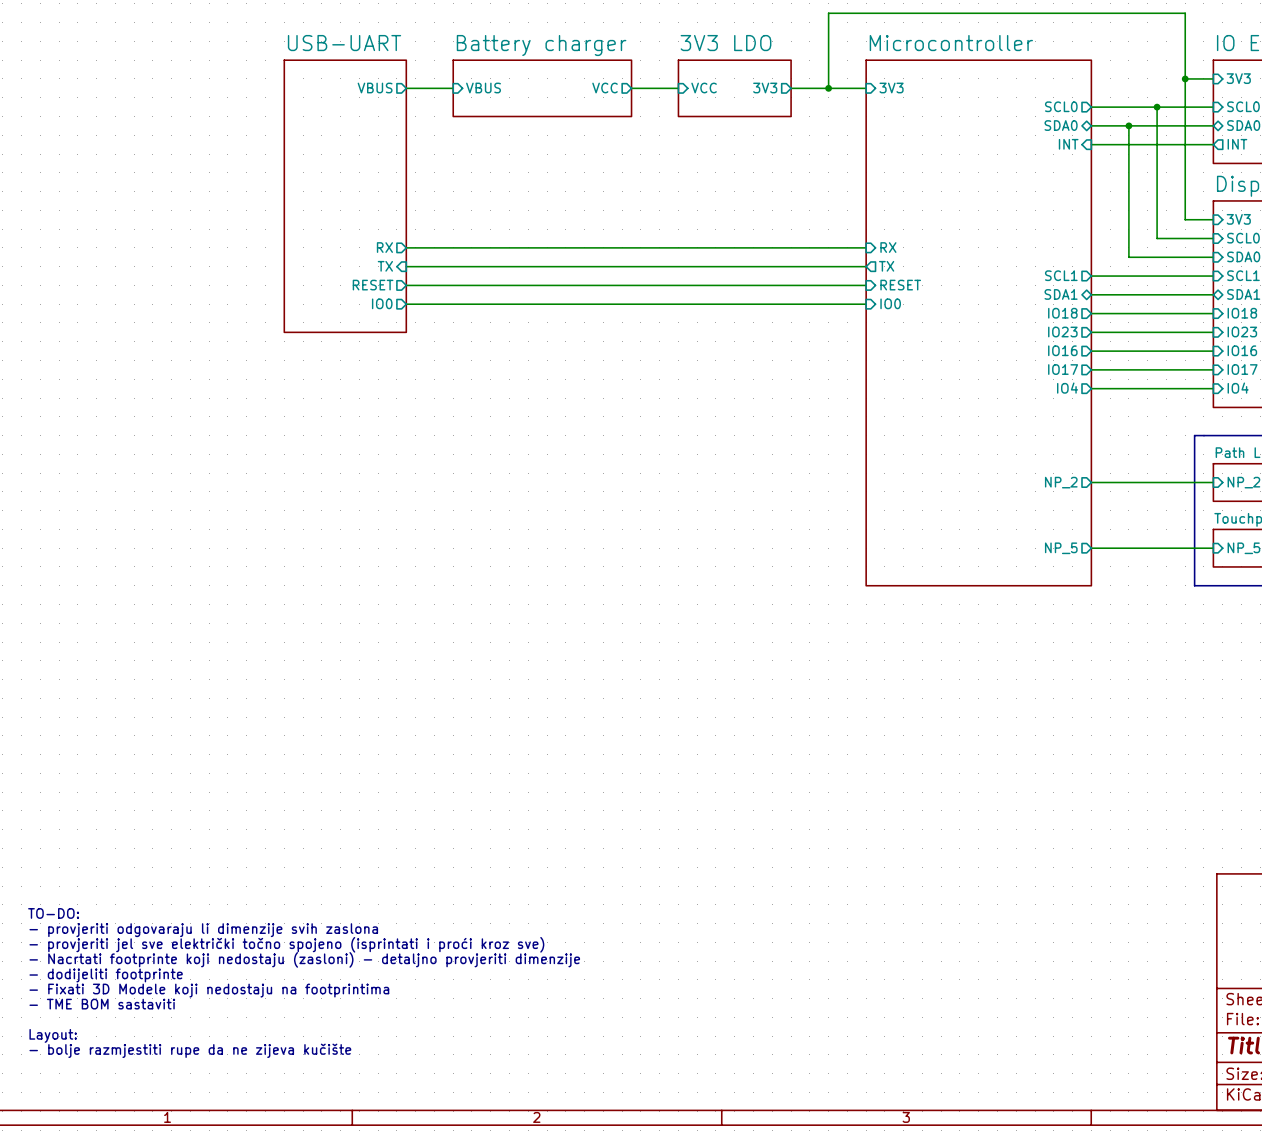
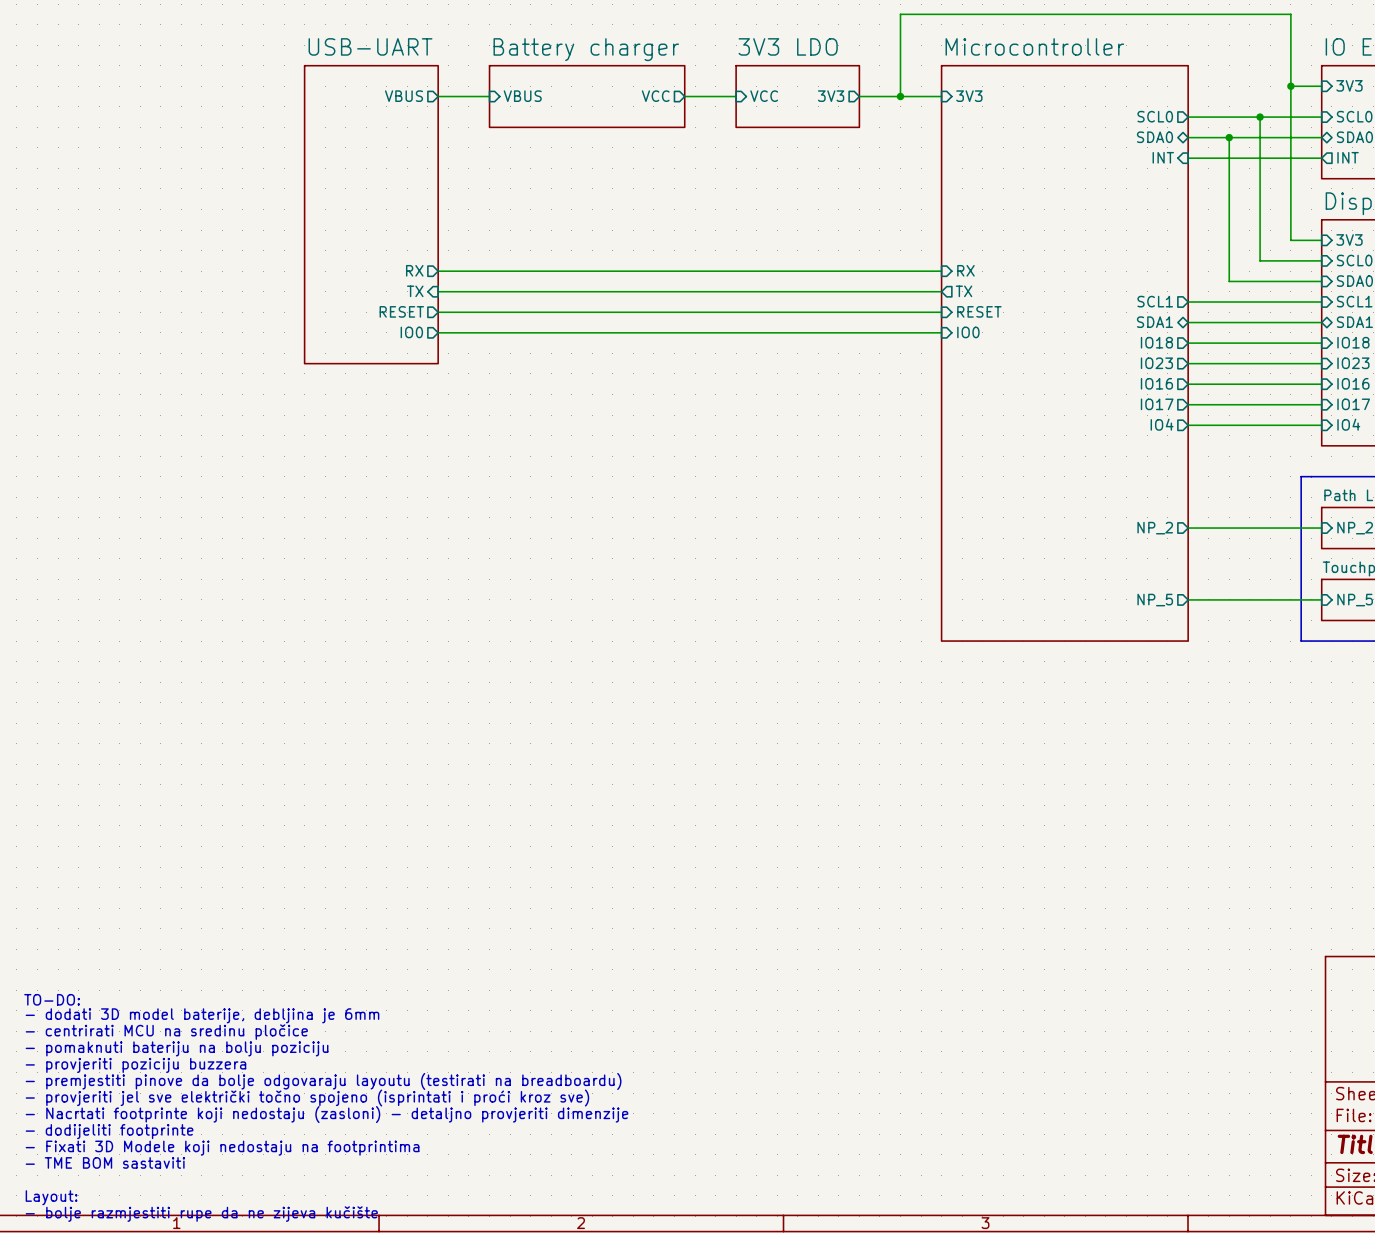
text: - provjeriti odgovaraju li dimenzije svih zaslona (203, 930) -> - dodati 3D model baterije, debljina je 6mm (202, 1015)
text: none -> - centrirati MCU na sredinu pločice (166, 1032)
text position: - provjeriti jel sve električki točno spojeno (isprintati i proći kroz sve) (286, 944) -> - provjeriti jel sve električki točno spojeno (isprintati i proći kroz sve) (307, 1098)
text: none -> - pomaknuti bateriju na bolju poziciju (177, 1048)
text position: - Nacrtati footprinte koji nedostaju (zasloni) - detaljno provjeriti dimenzije (304, 959) -> - Nacrtati footprinte koji nedostaju (zasloni) - detaljno provjeriti dimenzije (326, 1114)
text: none -> - provjeriti poziciju buzzera (135, 1065)
text position: - dodijeliti footprinte (106, 975) -> - dodijeliti footprinte (109, 1131)
text: none -> - premjestiti pinove da bolje odgovaraju layoutu (testirati na breadboardu) (323, 1081)
text position: - Fixati 3D Modele koji nedostaju na footprintima (209, 990) -> - Fixati 3D Modele koji nedostaju na footprintima (222, 1148)
text position: - TME BOM sastaviti (102, 1004) -> - TME BOM sastaviti (105, 1162)
text position: Layout: (53, 1035) -> Layout: (51, 1197)
text position: - bolje razmjestiti rupe da ne zijeva kučište (190, 1050) -> - bolje razmjestiti rupe da ne zijeva kučište (201, 1214)

